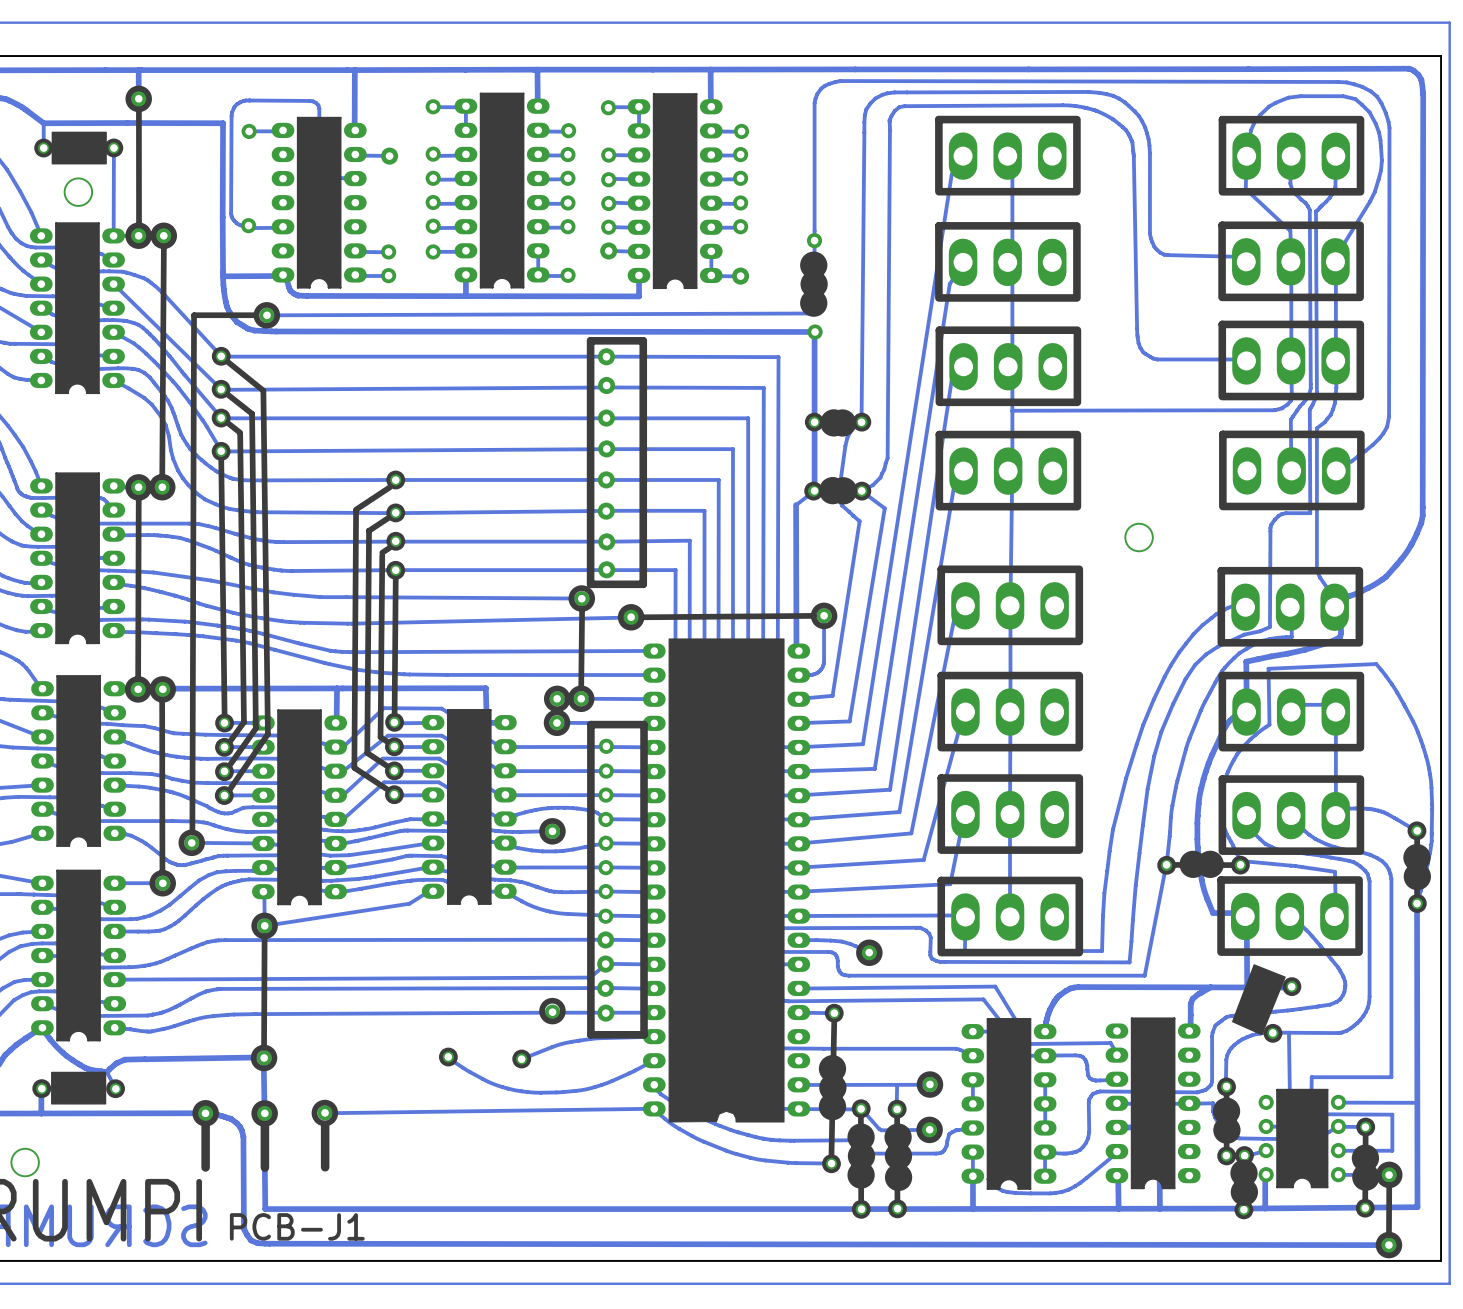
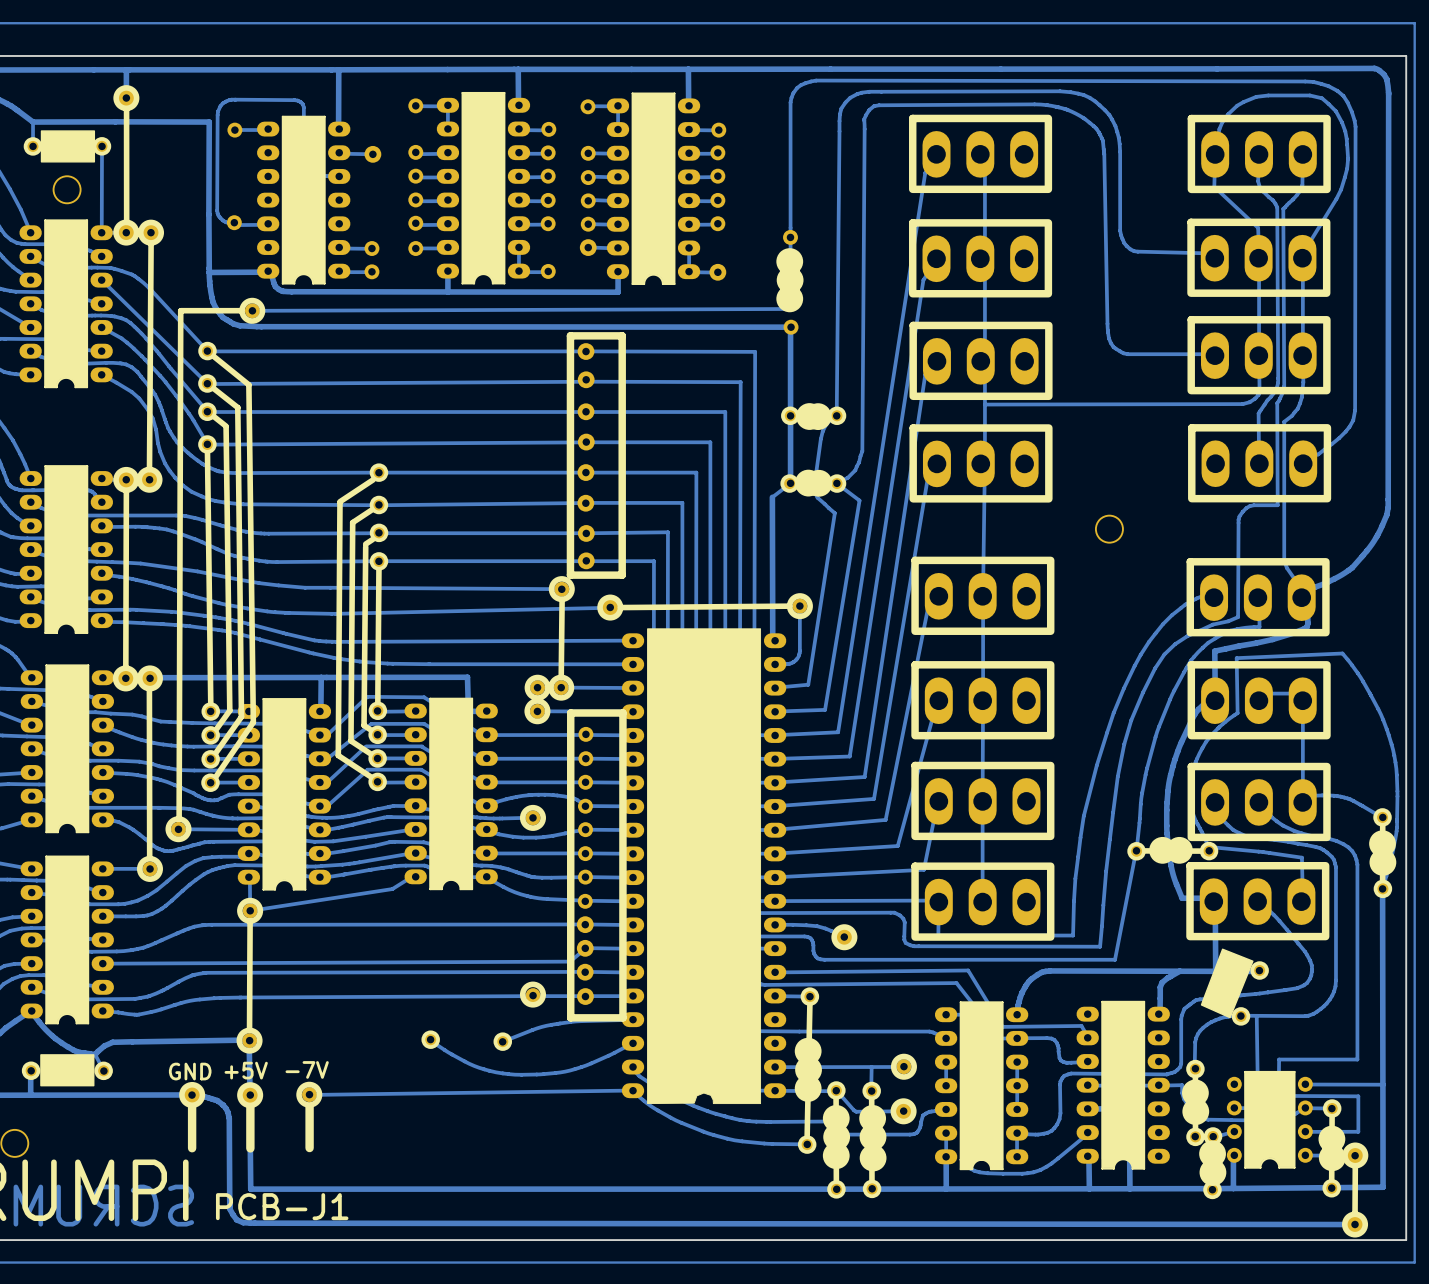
text: none -> -7V (307, 1069)
text: none -> +5V (246, 1070)
text: none -> GND (190, 1071)

